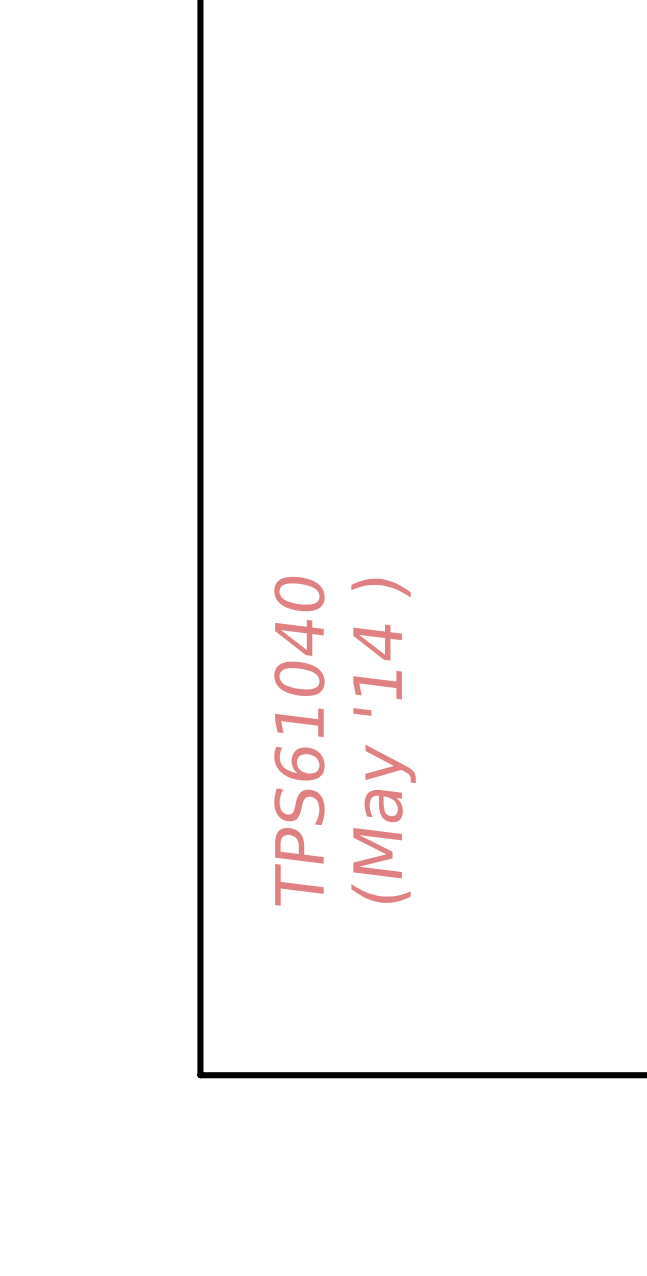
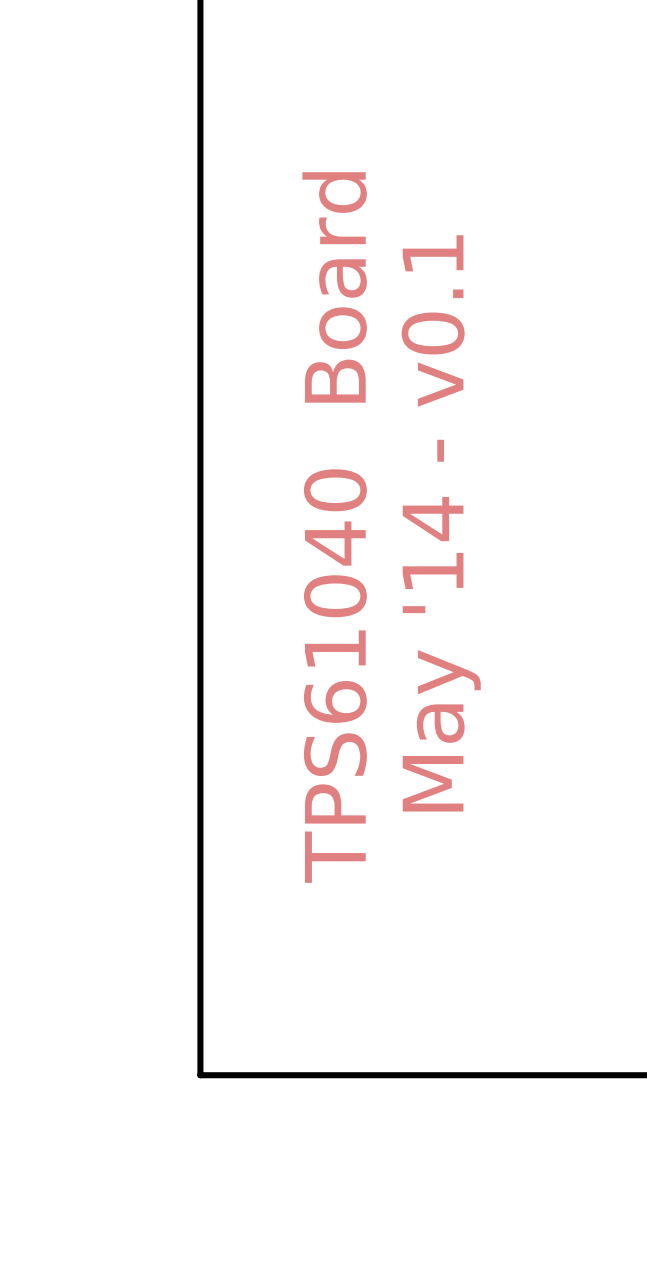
text: TPS61040 (299, 740) -> TPS61040 Board (334, 527)
text: (May '14 ) (383, 740) -> May '14 - v0.1 (441, 523)

